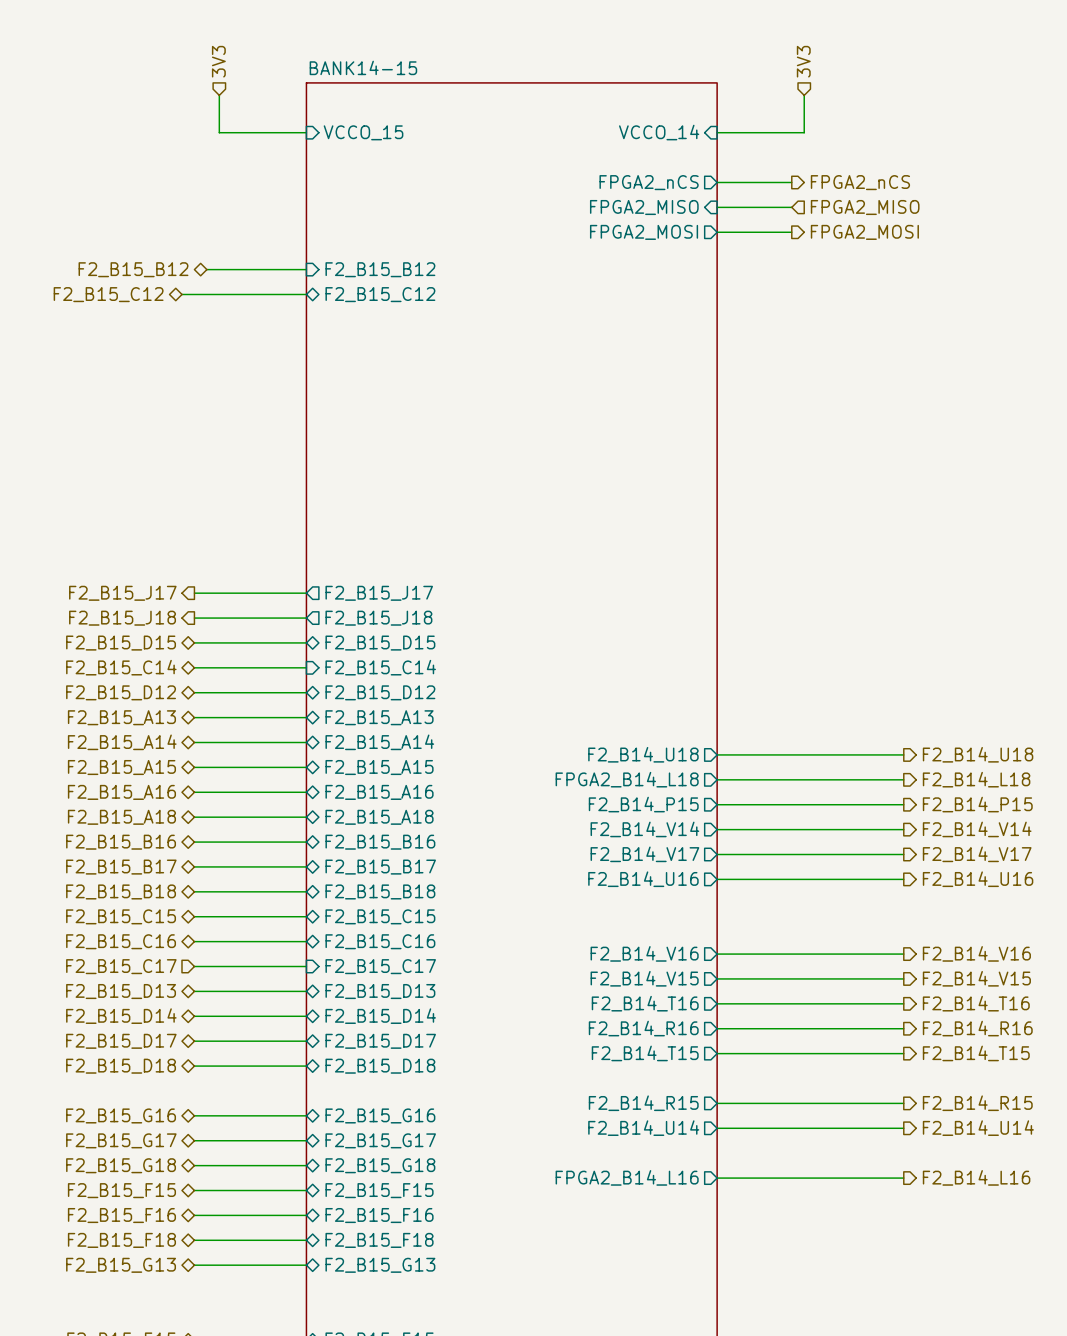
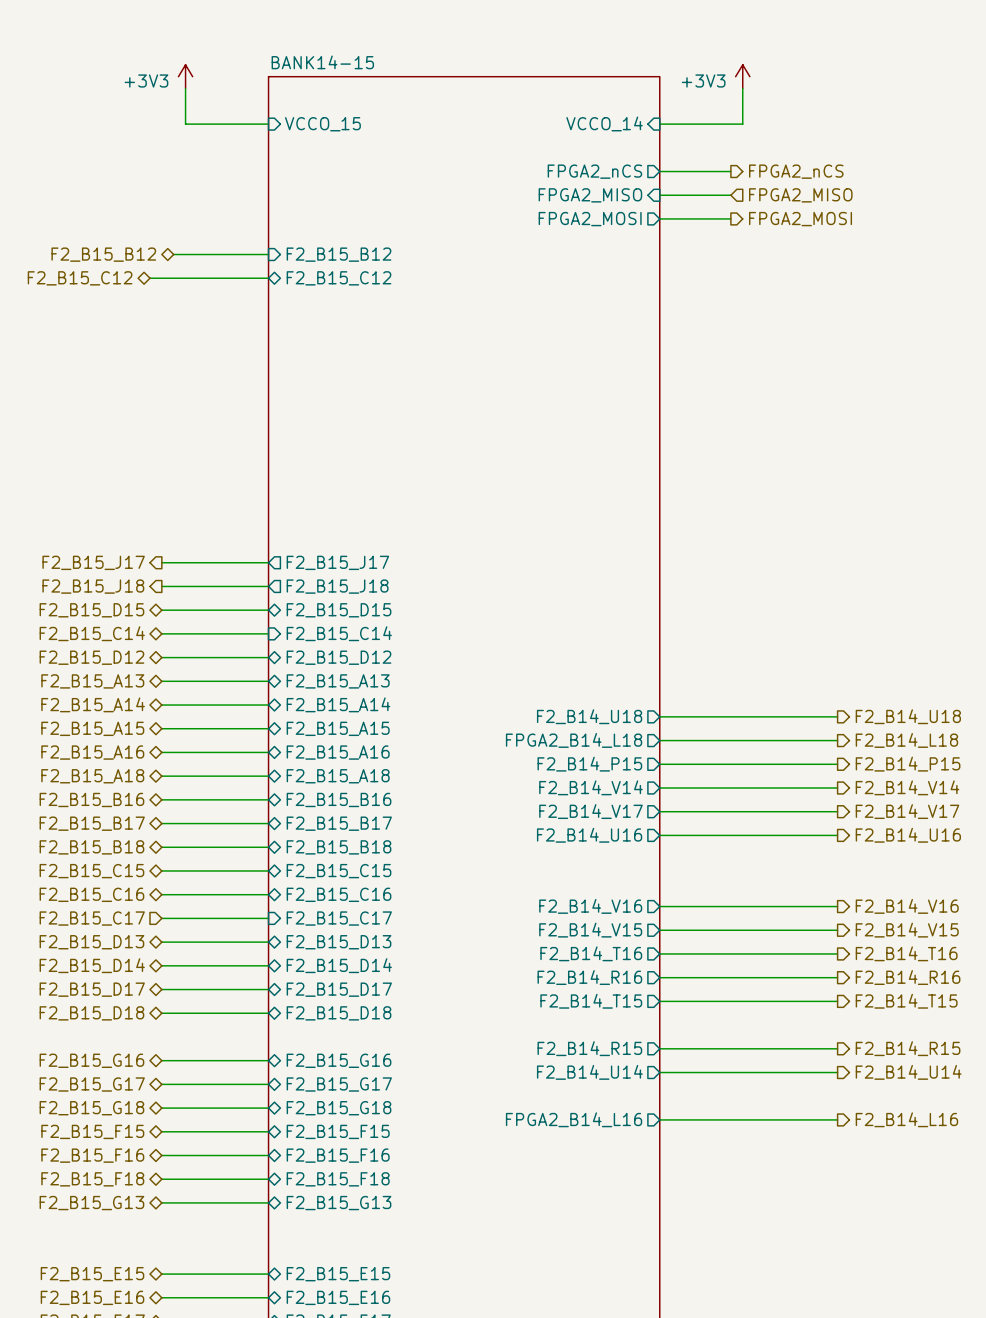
hierarchical label: 3V3 (218, 61) -> none
hierarchical label: 3V3 (803, 61) -> none
power symbol: none -> +3V3 (185, 76)
power symbol: none -> +3V3 (742, 76)

